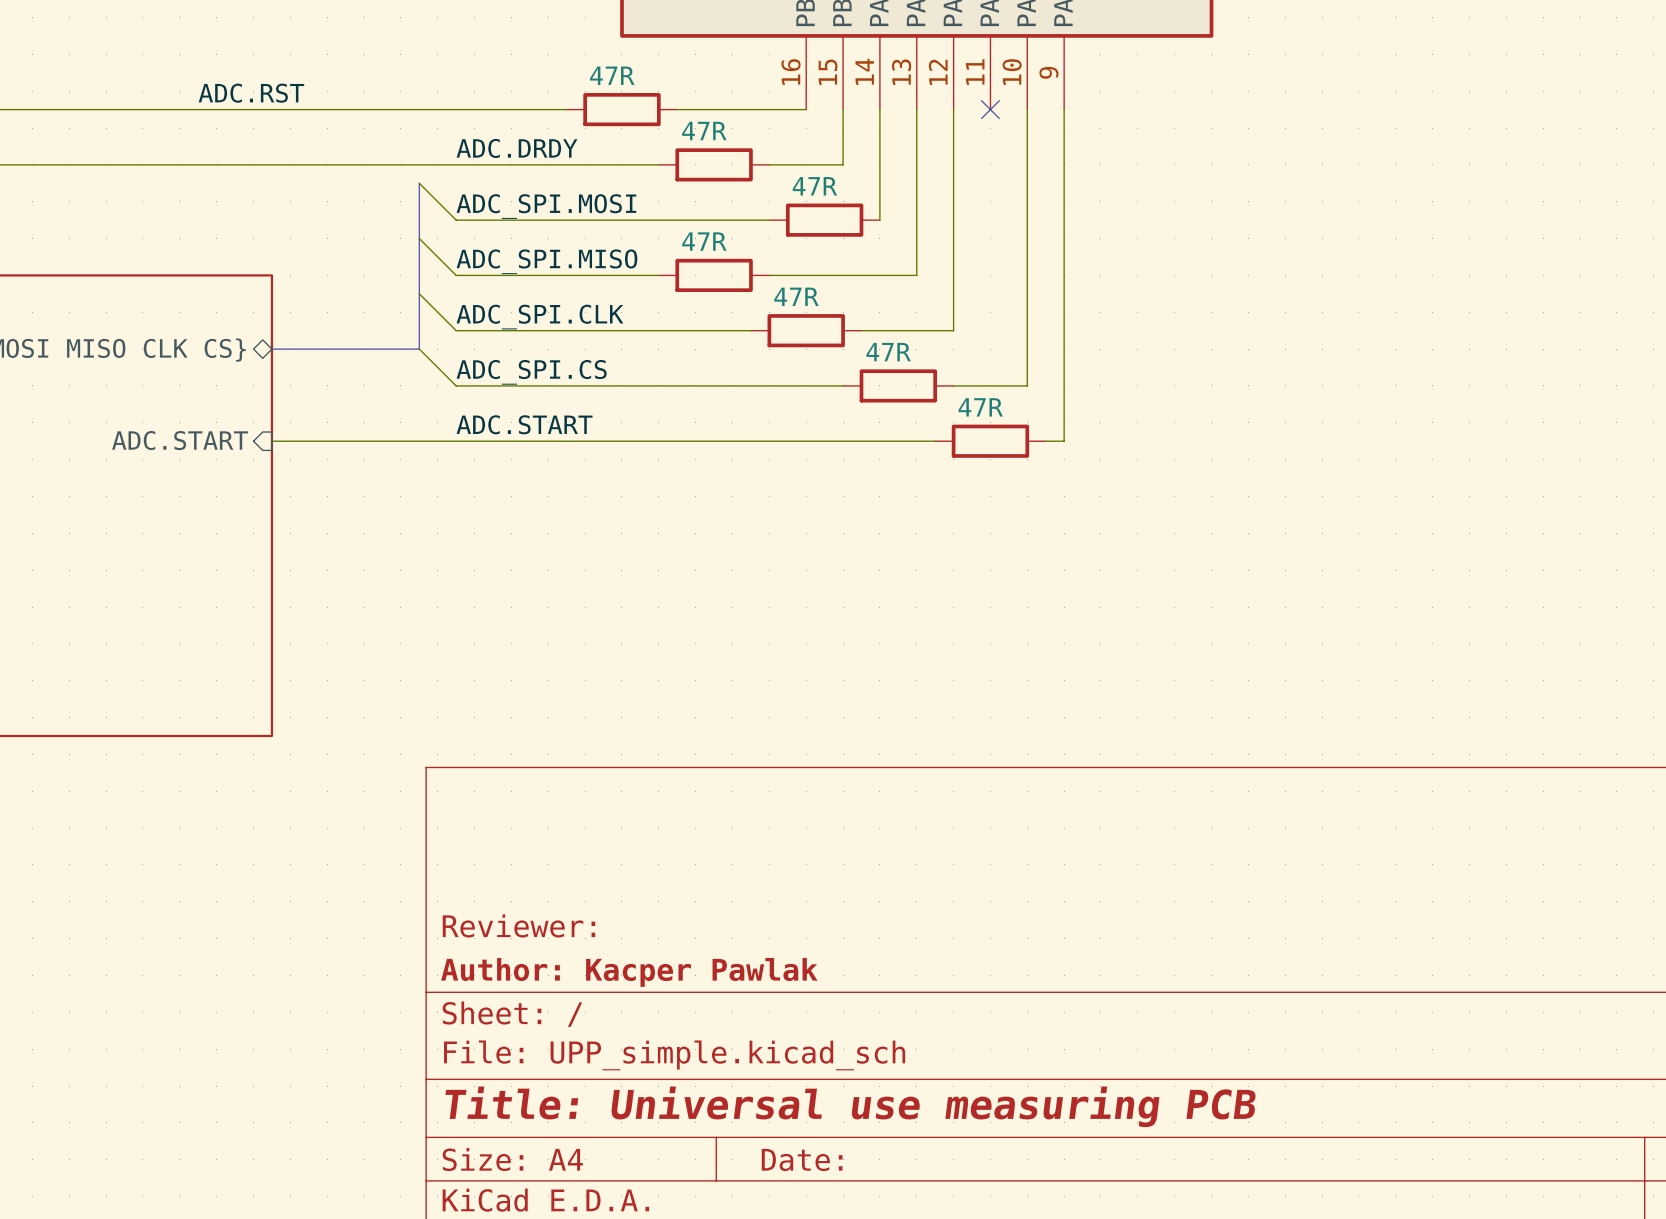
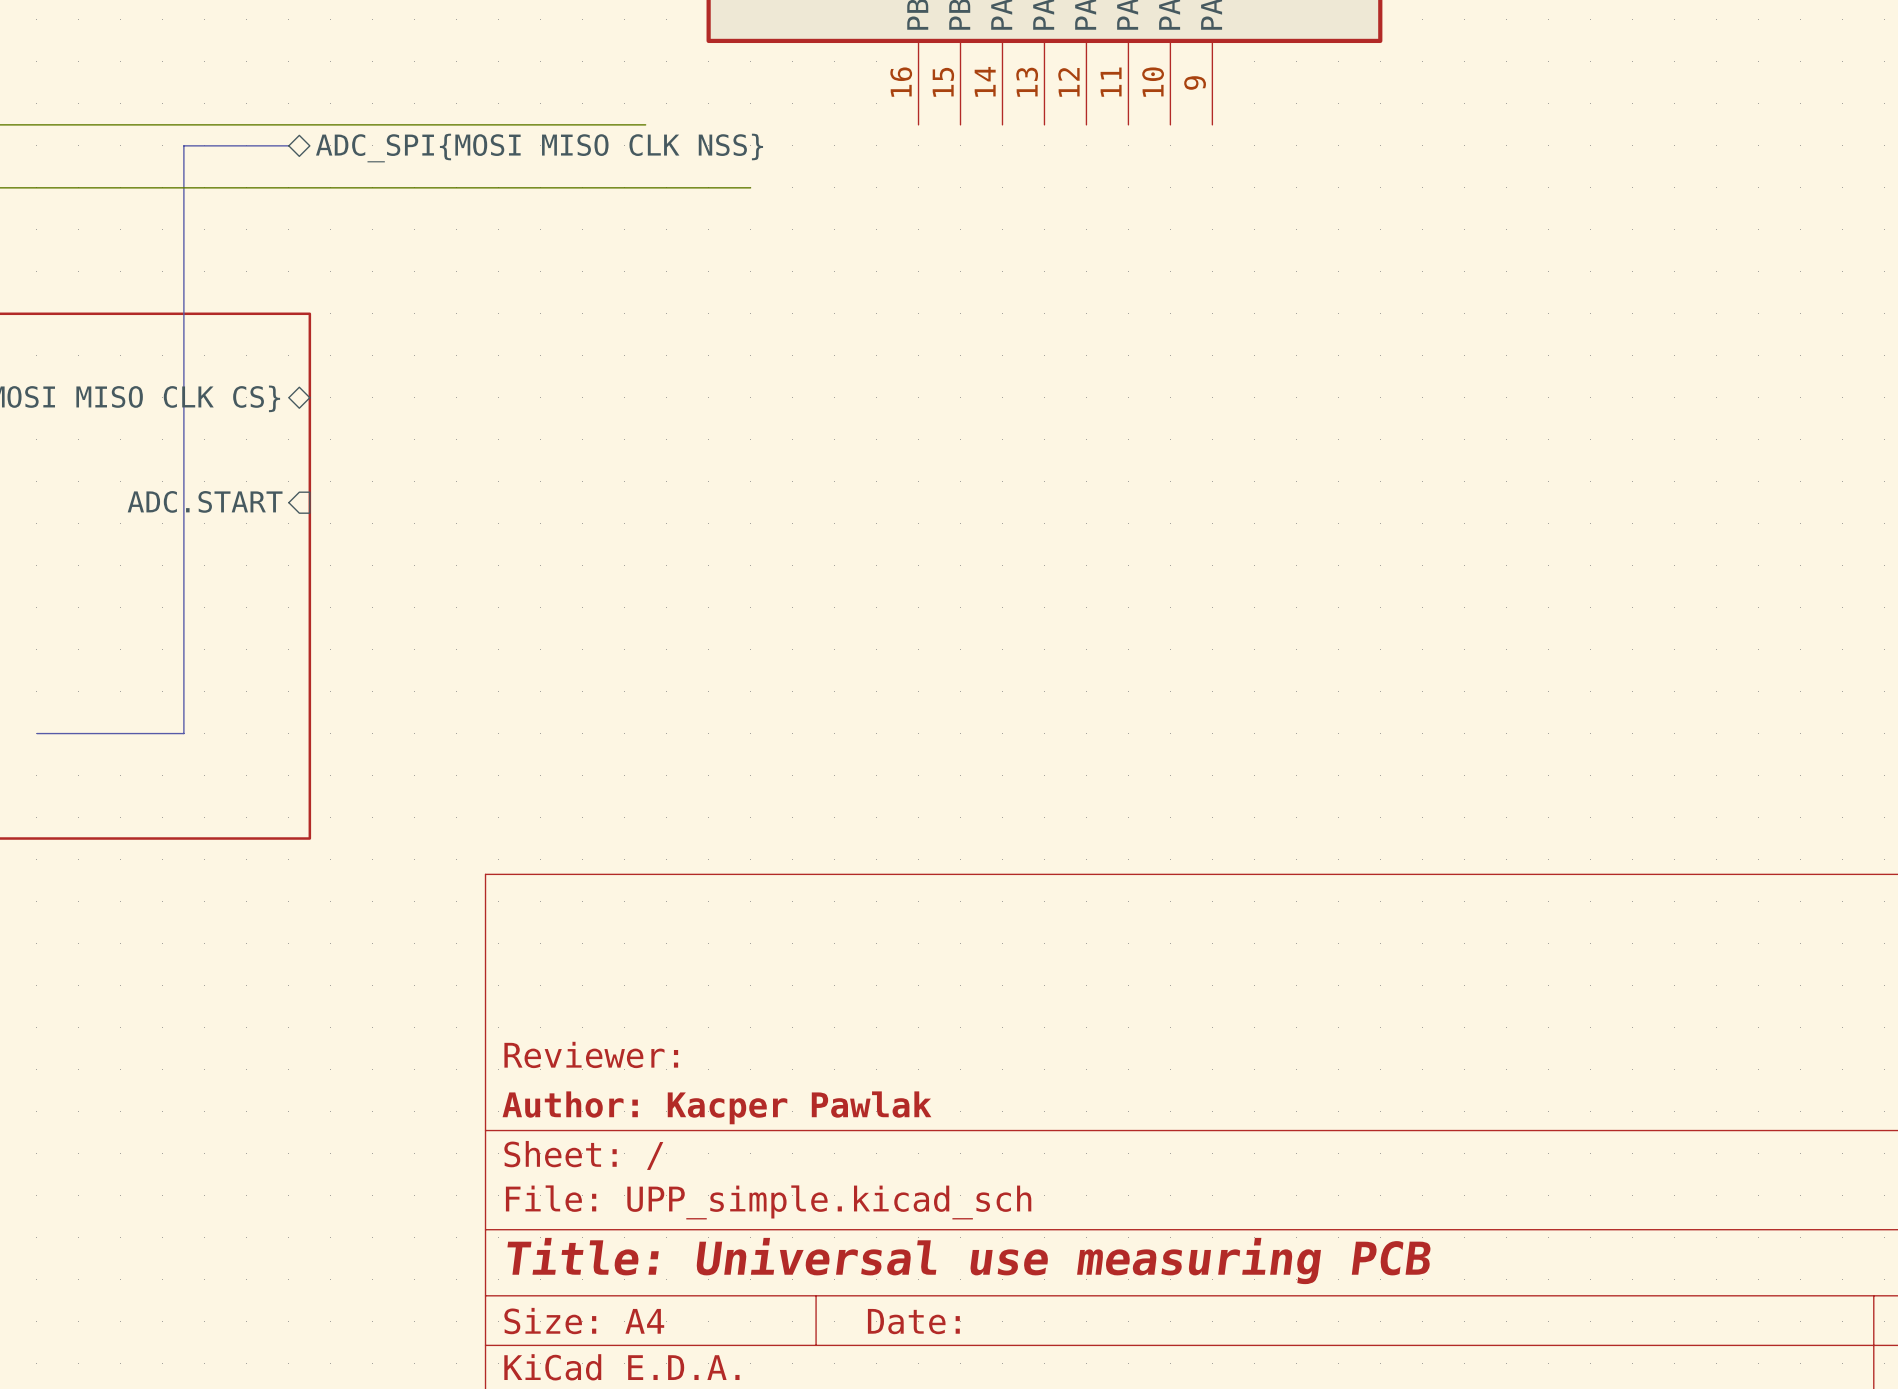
label: ADC.RST (251, 93) -> none
part: 47R (621, 109) -> none
wire: (677, 109) (806, 109) -> none
wire: (843, 109) (843, 164) (769, 164) -> none
wire: (879, 109) (879, 220) -> none
wire: (916, 109) (916, 275) (769, 275) -> none
wire: (953, 109) (953, 330) (861, 330) -> none
no-connect mark: (990, 109) -> none
wire: (1027, 109) (1027, 385) (953, 385) -> none
wire: (1064, 109) (1064, 441) (1045, 441) -> none
bus: none -> (288, 145) (183, 145) (183, 733) (36, 733)
sheet pin: none -> ADC_SPI{MOSI MISO CLK NSS} (539, 148)
label: ADC.DRDY (517, 148) -> none
part: 47R (714, 164) -> none
wire: (419, 183) (456, 220) (769, 220) -> none
bus: (419, 183) (419, 349) (271, 349) -> none
label: ADC_SPI.MOSI (546, 206) -> none
part: 47R (824, 220) -> none
wire: (419, 238) (456, 275) (658, 275) -> none
label: ADC_SPI.MISO (546, 261) -> none
part: 47R (714, 275) -> none
wire: (419, 293) (456, 330) (750, 330) -> none
label: ADC_SPI.CLK (540, 317) -> none
part: 47R (806, 330) -> none
wire: (419, 349) (456, 385) (843, 385) -> none
label: ADC_SPI.CS (531, 372) -> none
part: 47R (898, 385) -> none
label: ADC.START (524, 424) -> none
wire: (271, 441) (935, 441) -> none
part: 47R (990, 441) -> none

